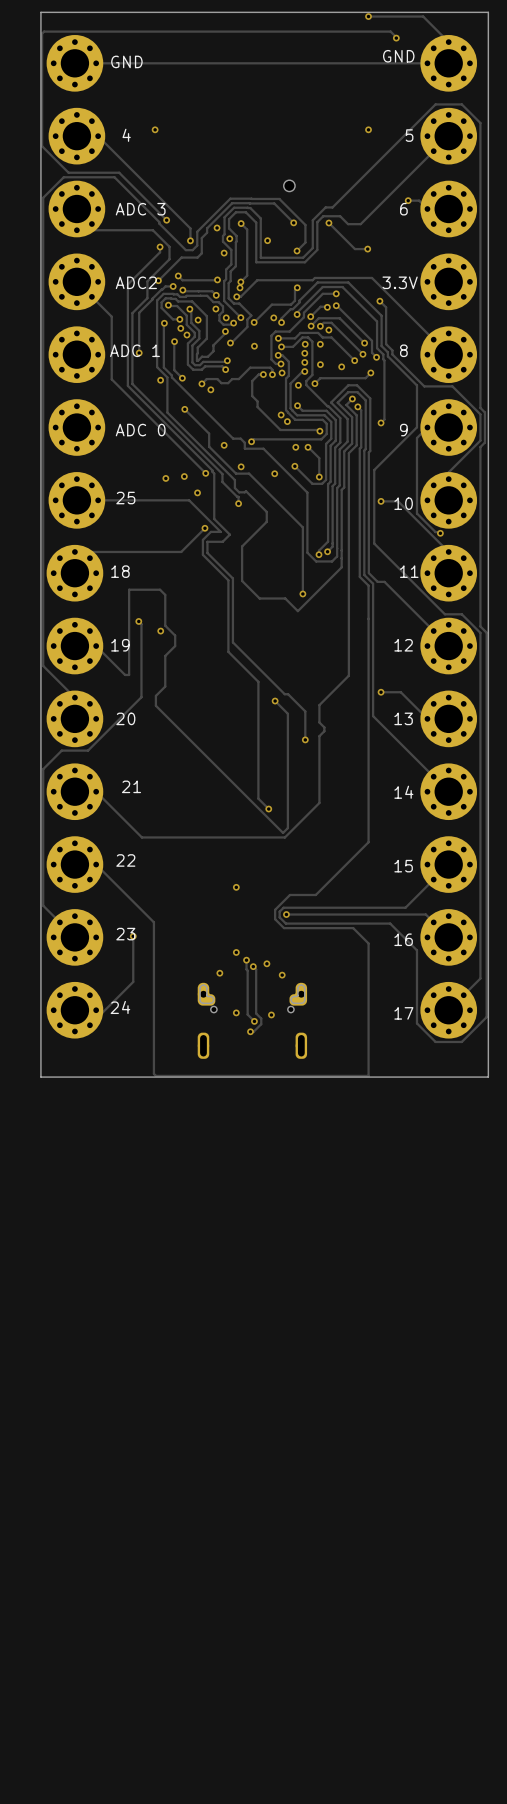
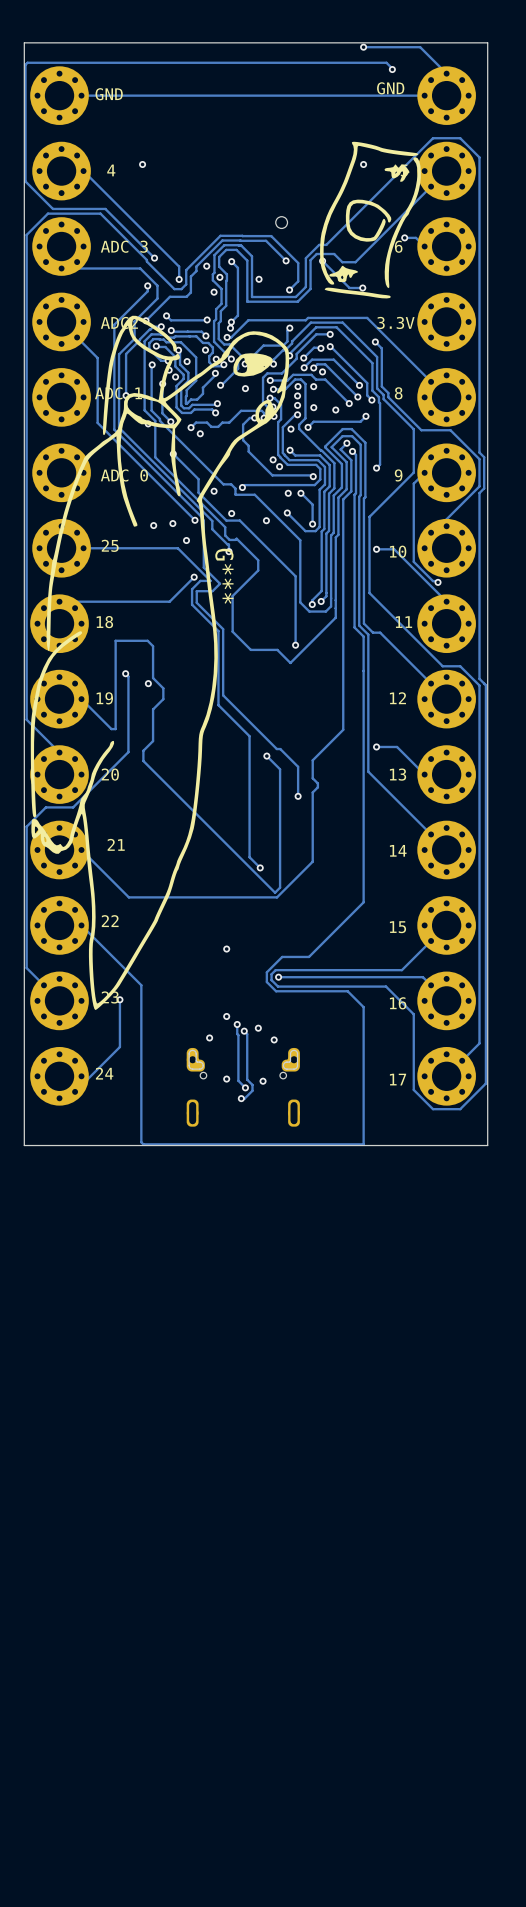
G***: none -> (225, 575)

